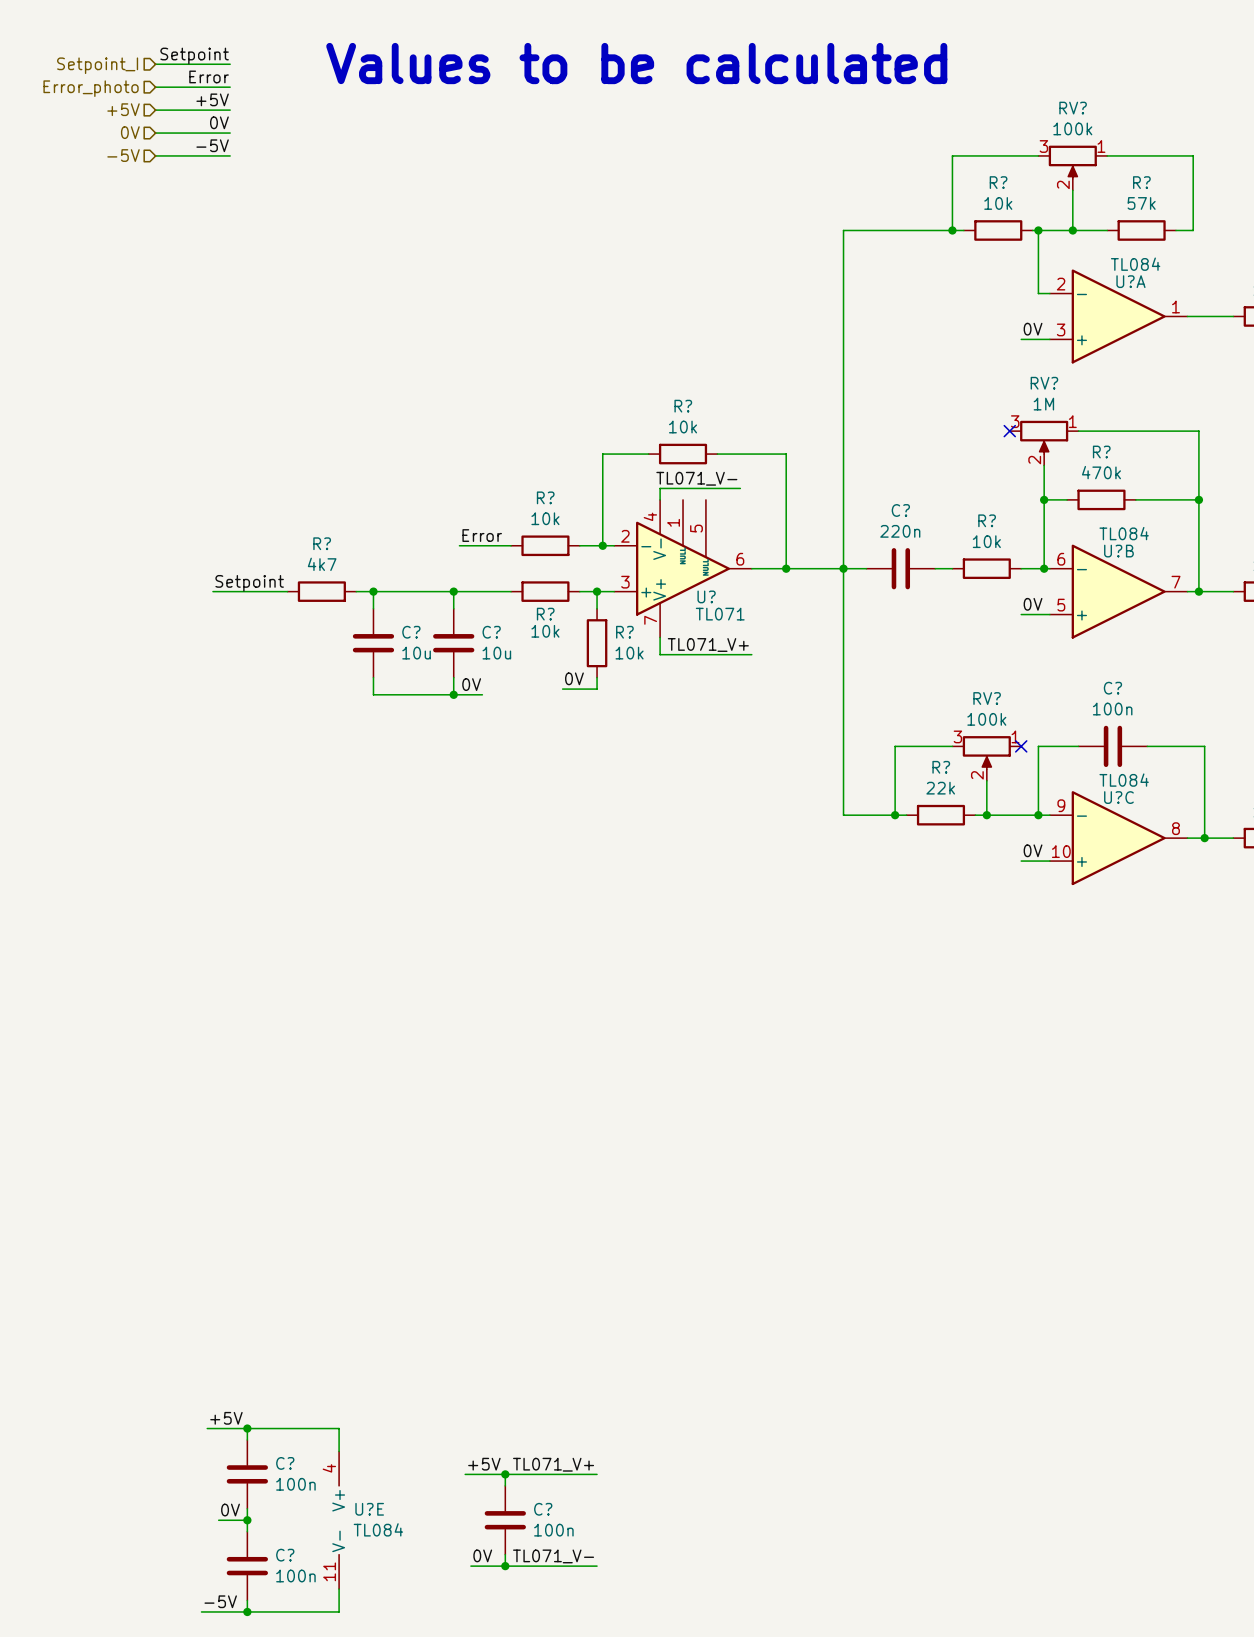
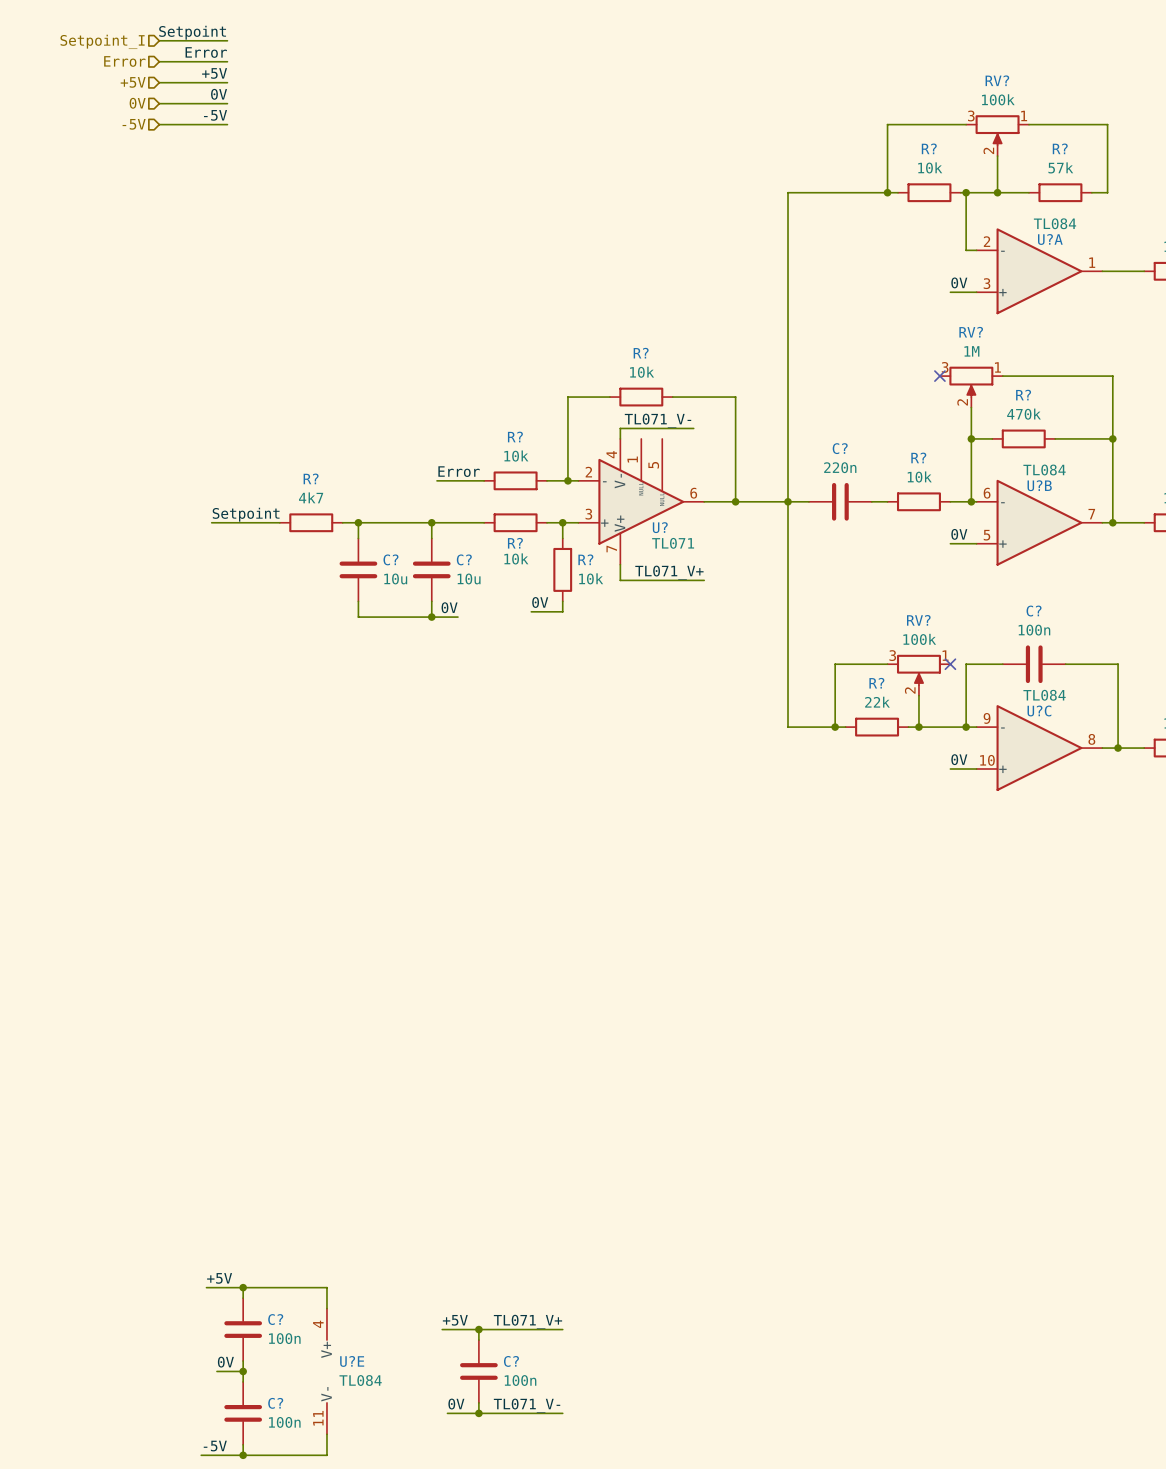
text: Values to be calculated (636, 63) -> none
hierarchical label: Error_photo (91, 88) -> Error (124, 61)

